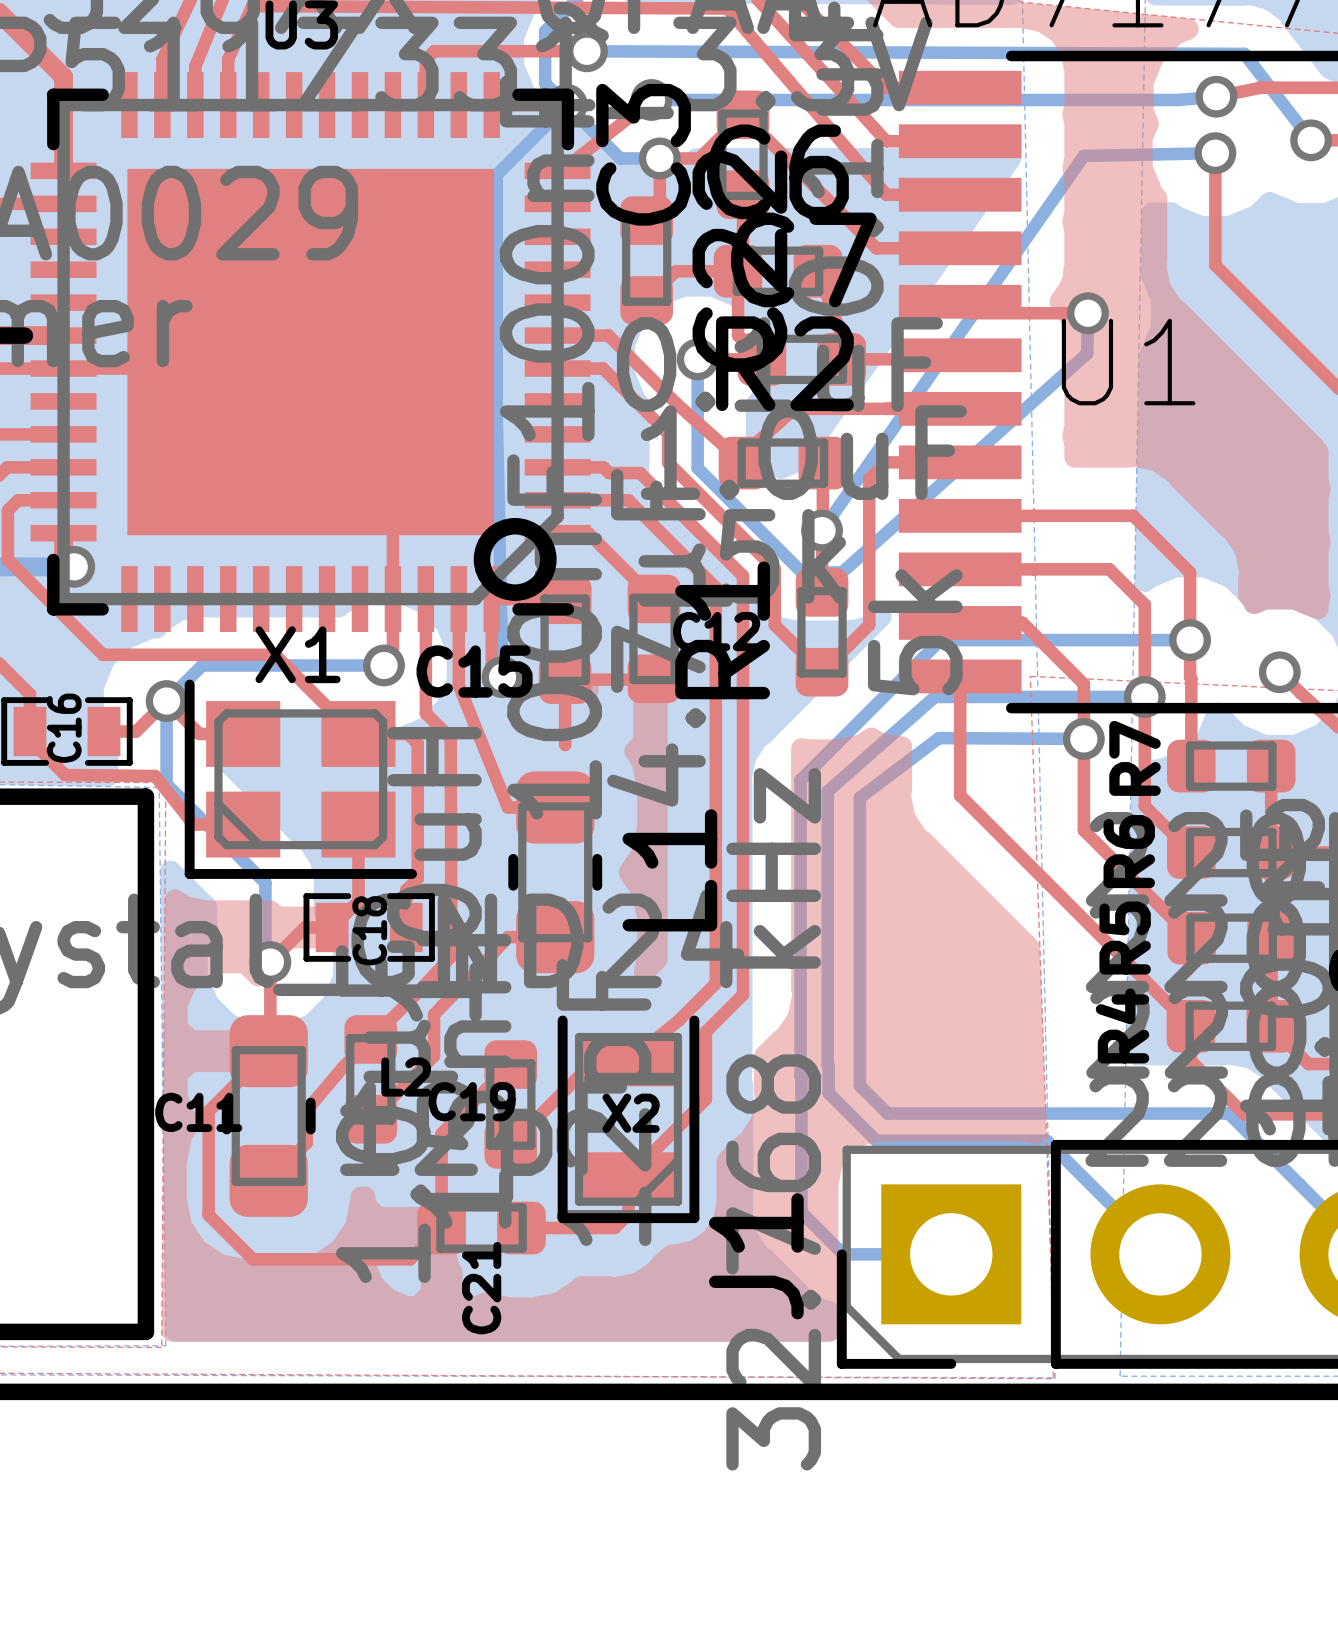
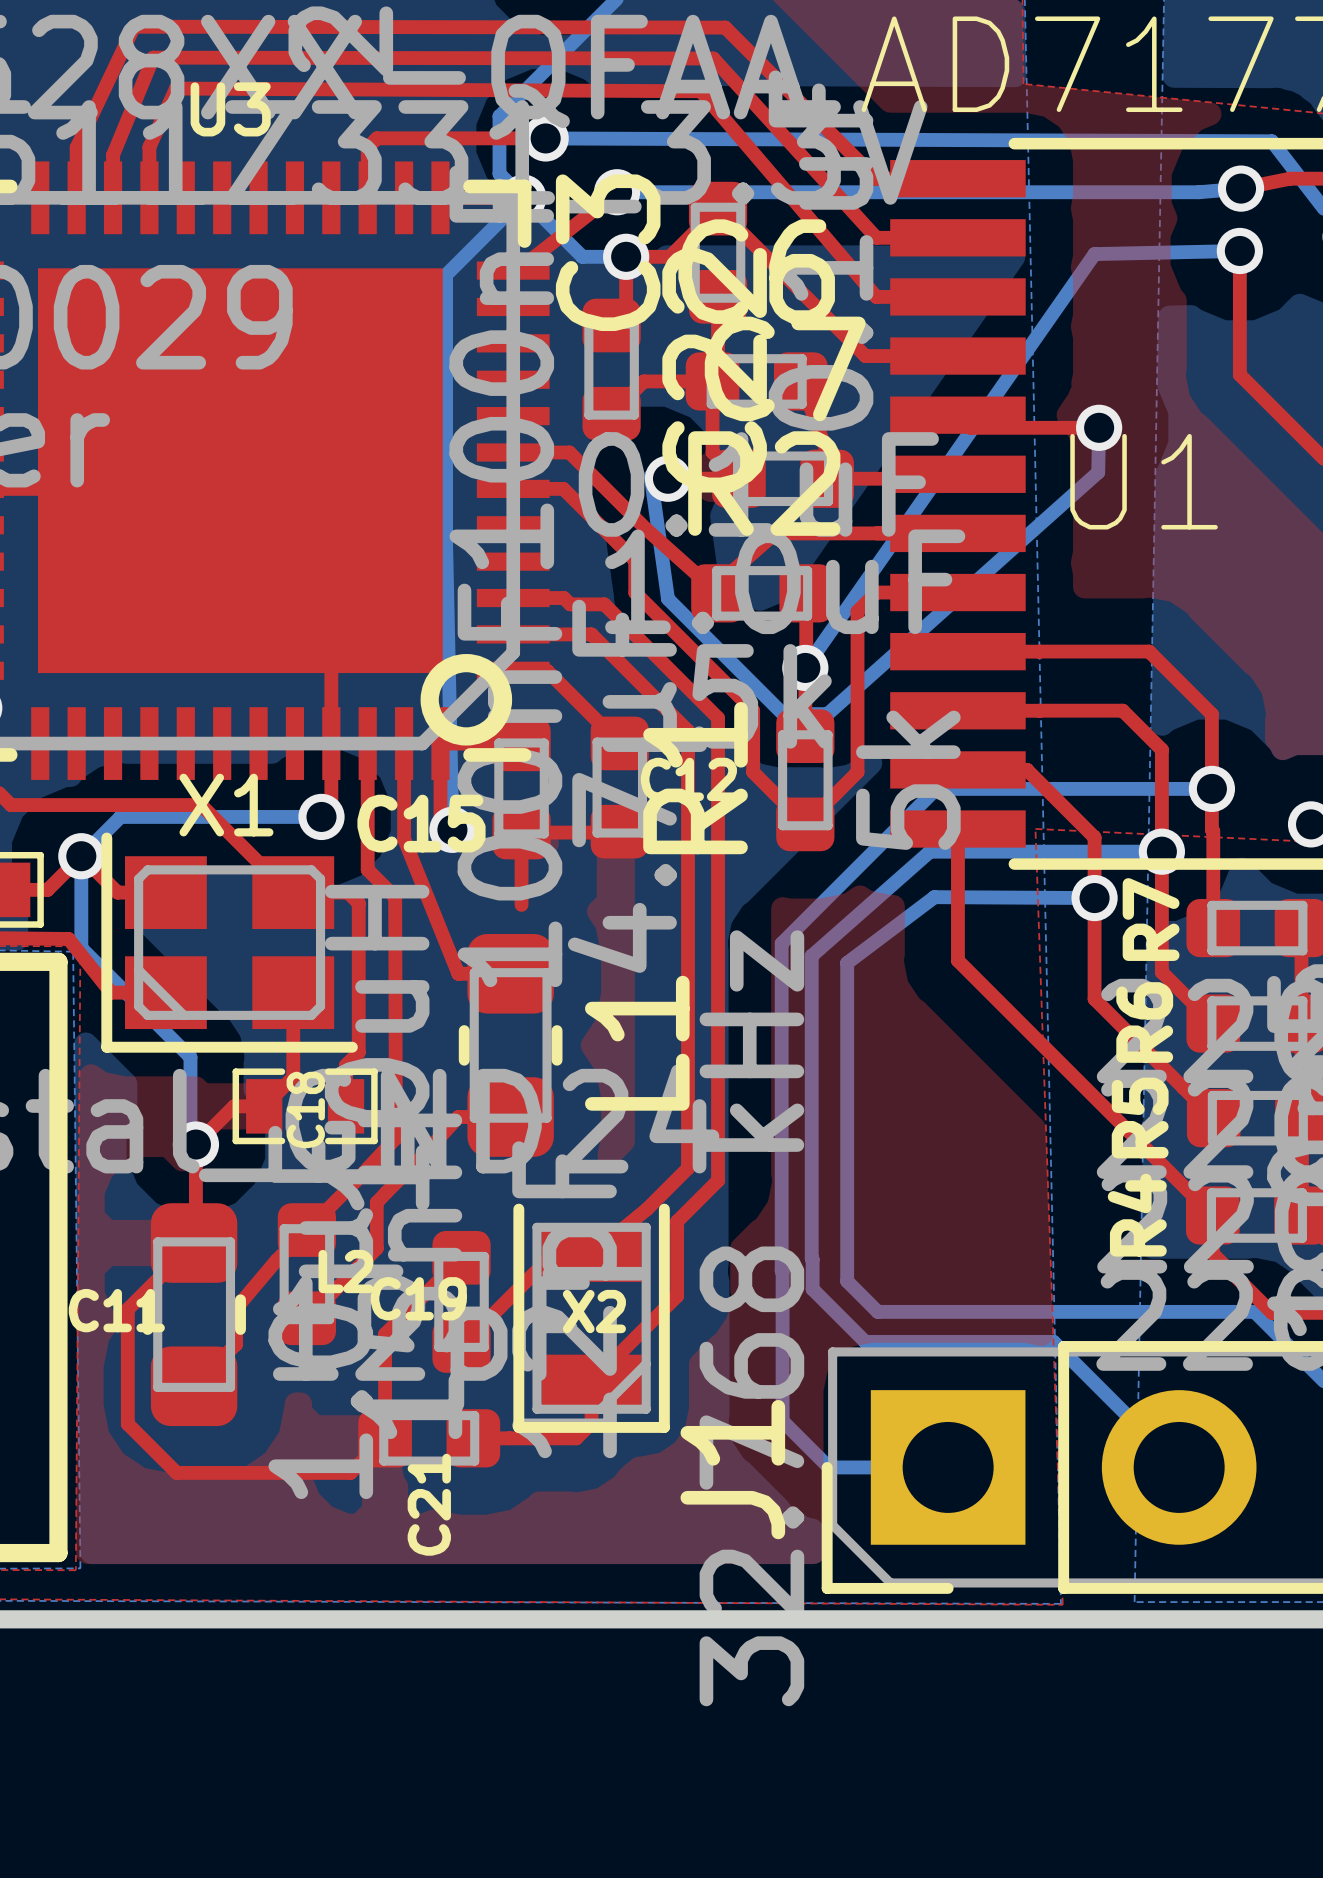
bottom track: (697, 359) (697, 468) -> (650, 476) (667, 598)

